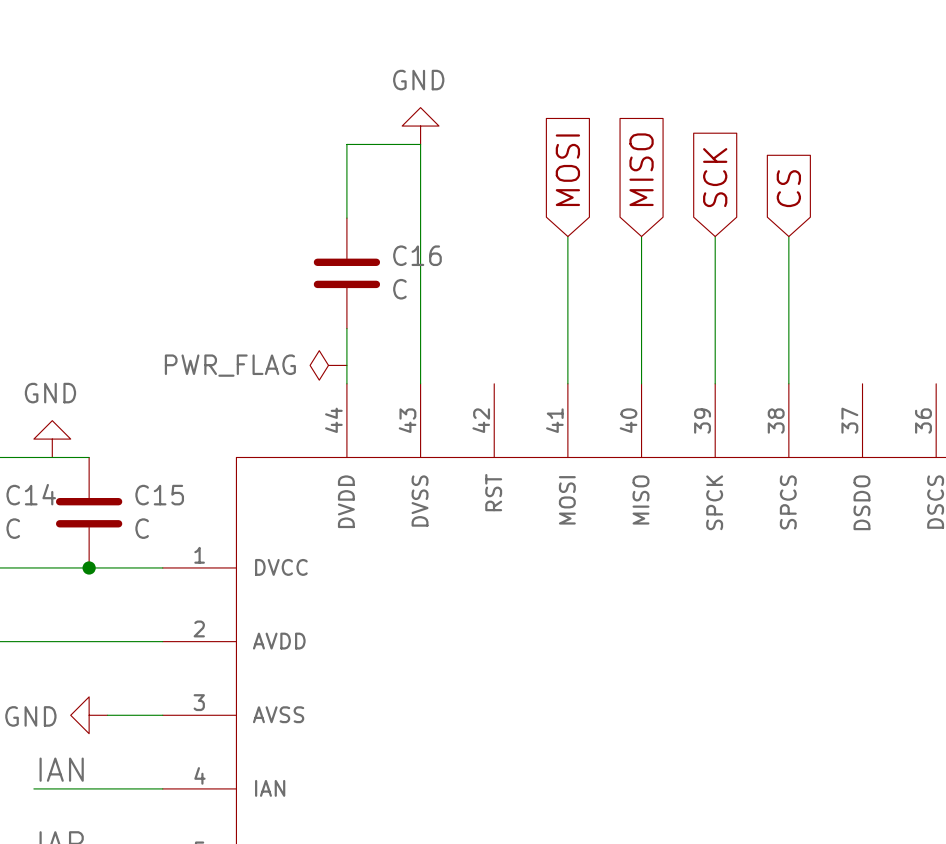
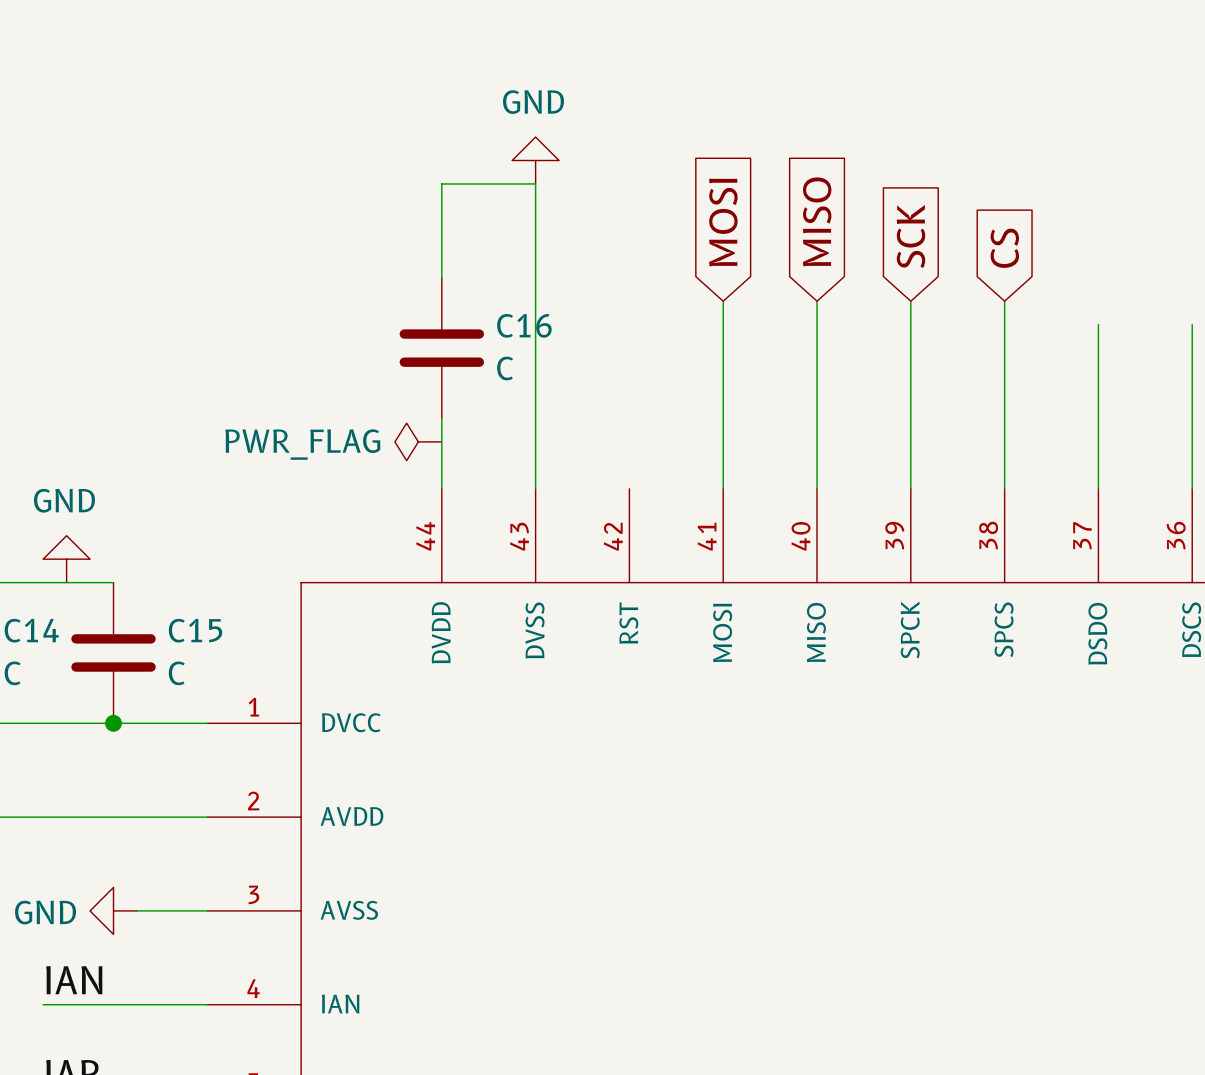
wire: none -> (1098, 324) (1098, 488)
wire: none -> (1192, 324) (1192, 488)
power symbol position: PWR_FLAG (328, 365) -> PWR_FLAG (418, 441)

